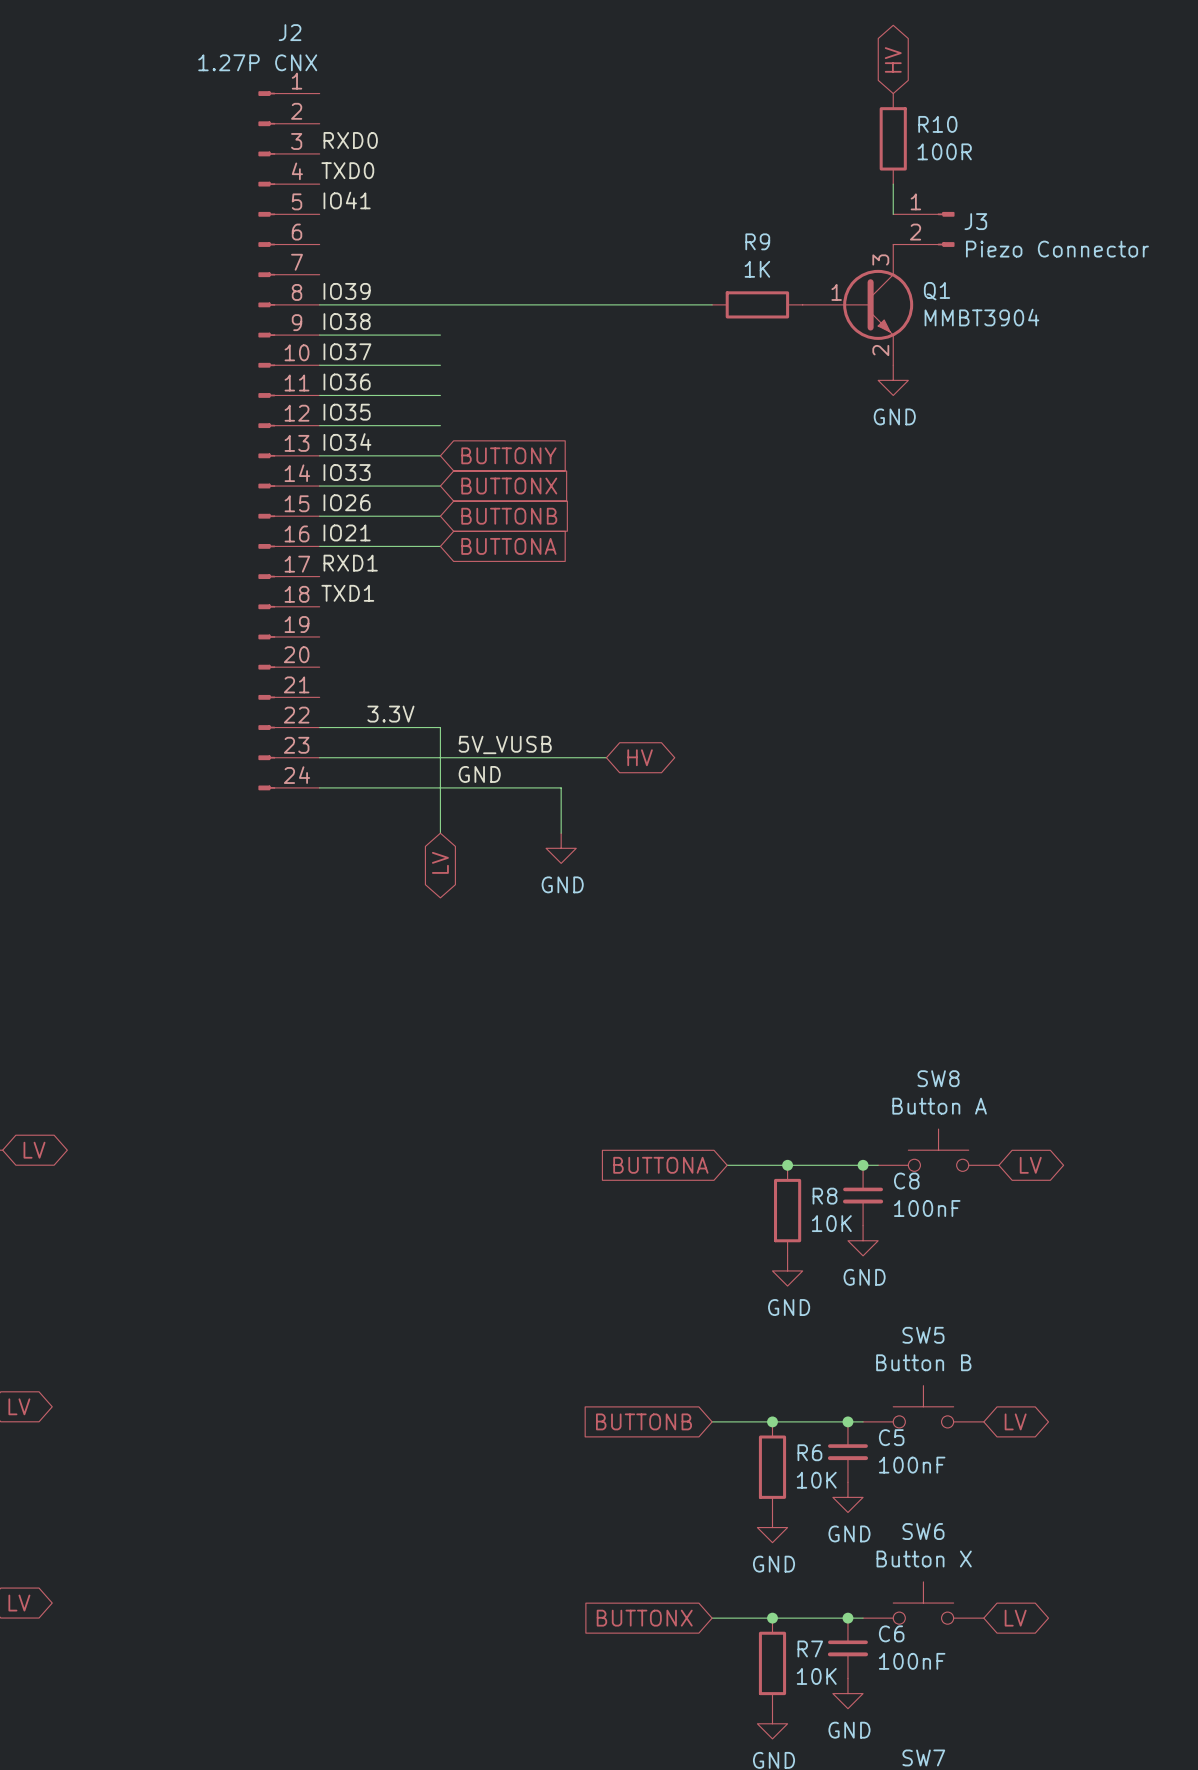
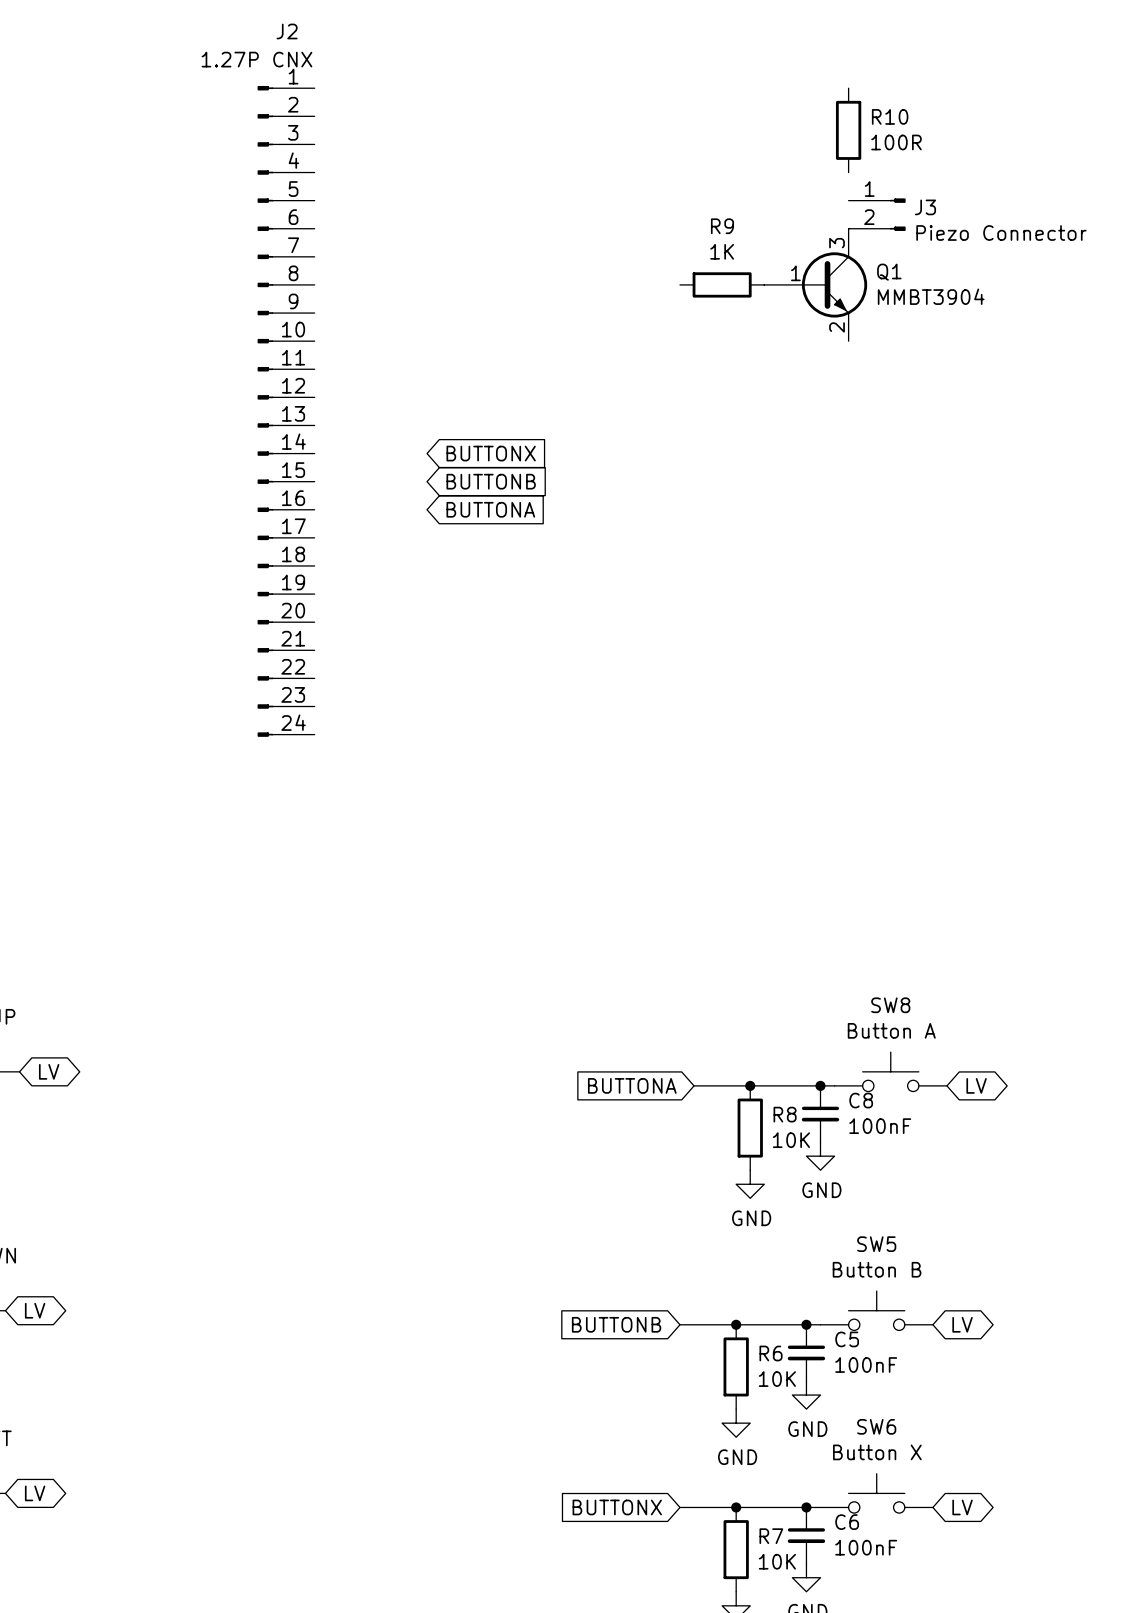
global label: HV (893, 59) -> none
label: RXD0 (350, 140) -> none
label: TXD0 (347, 170) -> none
wire: (893, 184) (893, 214) -> none
label: IO41 (347, 200) -> none
label: IO39 (347, 291) -> none
wire: (319, 304) (712, 304) -> none
label: IO38 (347, 321) -> none
wire: (319, 335) (440, 335) -> none
label: IO37 (347, 351) -> none
wire: (319, 365) (440, 365) -> none
power symbol: GND (893, 380) -> none
label: IO36 (347, 381) -> none
wire: (319, 395) (440, 395) -> none
label: IO35 (347, 412) -> none
wire: (319, 425) (440, 425) -> none
label: IO34 (347, 442) -> none
wire: (319, 455) (440, 455) -> none
global label: BUTTONY (508, 455) -> none
label: IO33 (347, 472) -> none
wire: (319, 486) (440, 486) -> none
label: IO26 (347, 502) -> none
wire: (319, 516) (440, 516) -> none
label: IO21 (347, 532) -> none
wire: (319, 546) (440, 546) -> none
label: RXD1 (350, 563) -> none
label: TXD1 (347, 593) -> none
label: 3.3V (390, 714) -> none
wire: (319, 727) (440, 727) (440, 833) -> none
label: 5V_VUSB (505, 744) -> none
wire: (319, 757) (606, 757) -> none
global label: HV (640, 757) -> none
label: GND (479, 774) -> none
wire: (319, 787) (561, 787) (561, 833) -> none
power symbol: GND (561, 848) -> none
global label: LV (440, 862) -> none

